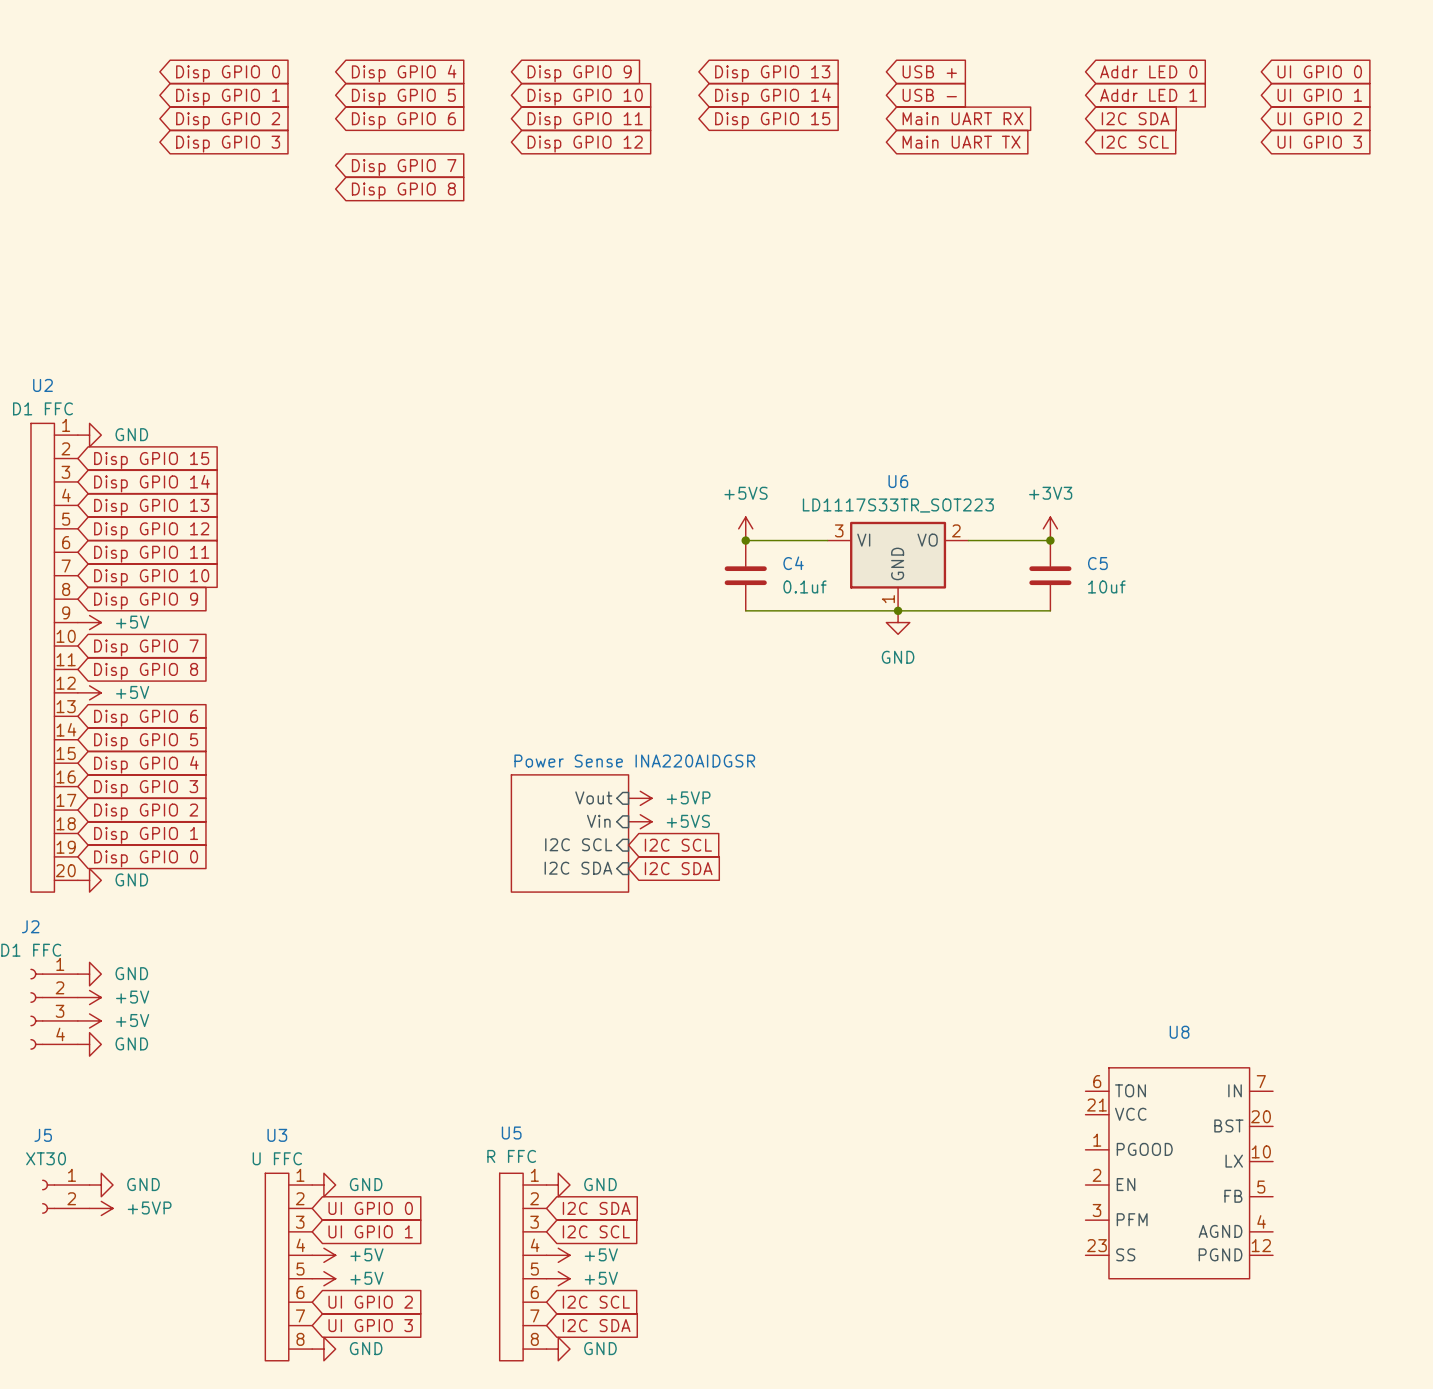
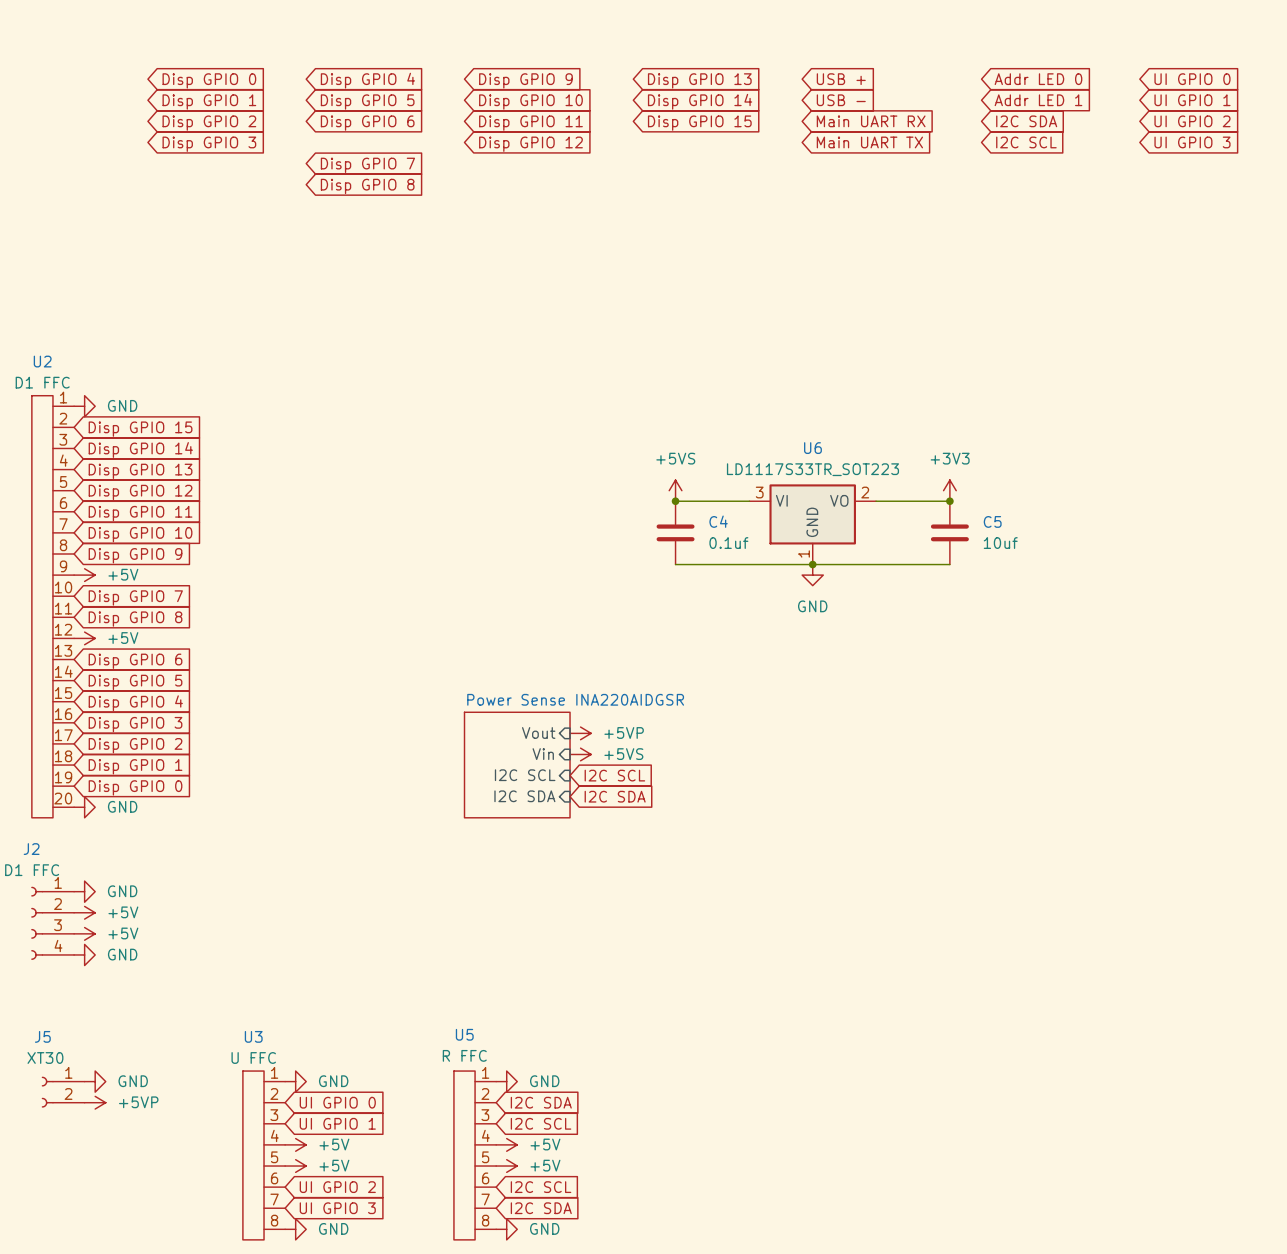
U8: (1179, 1173) -> none

